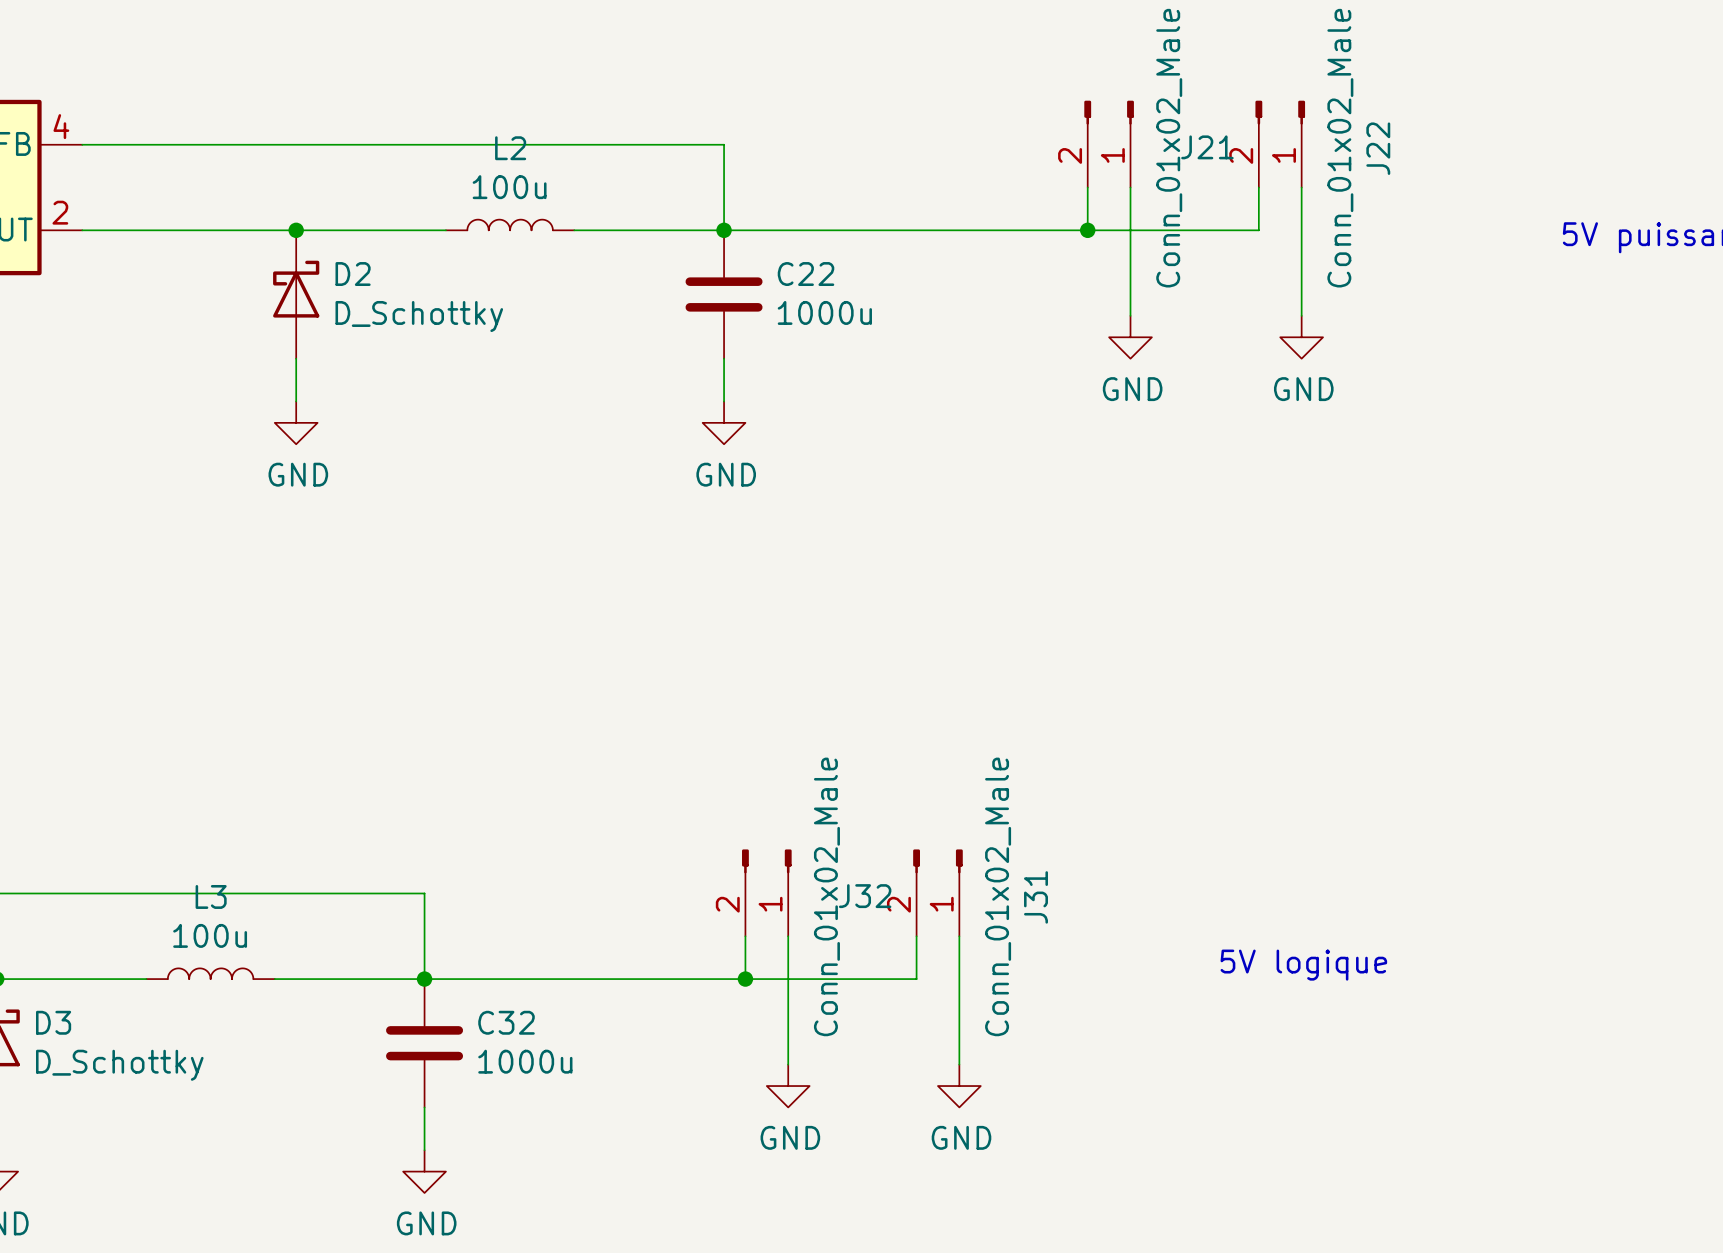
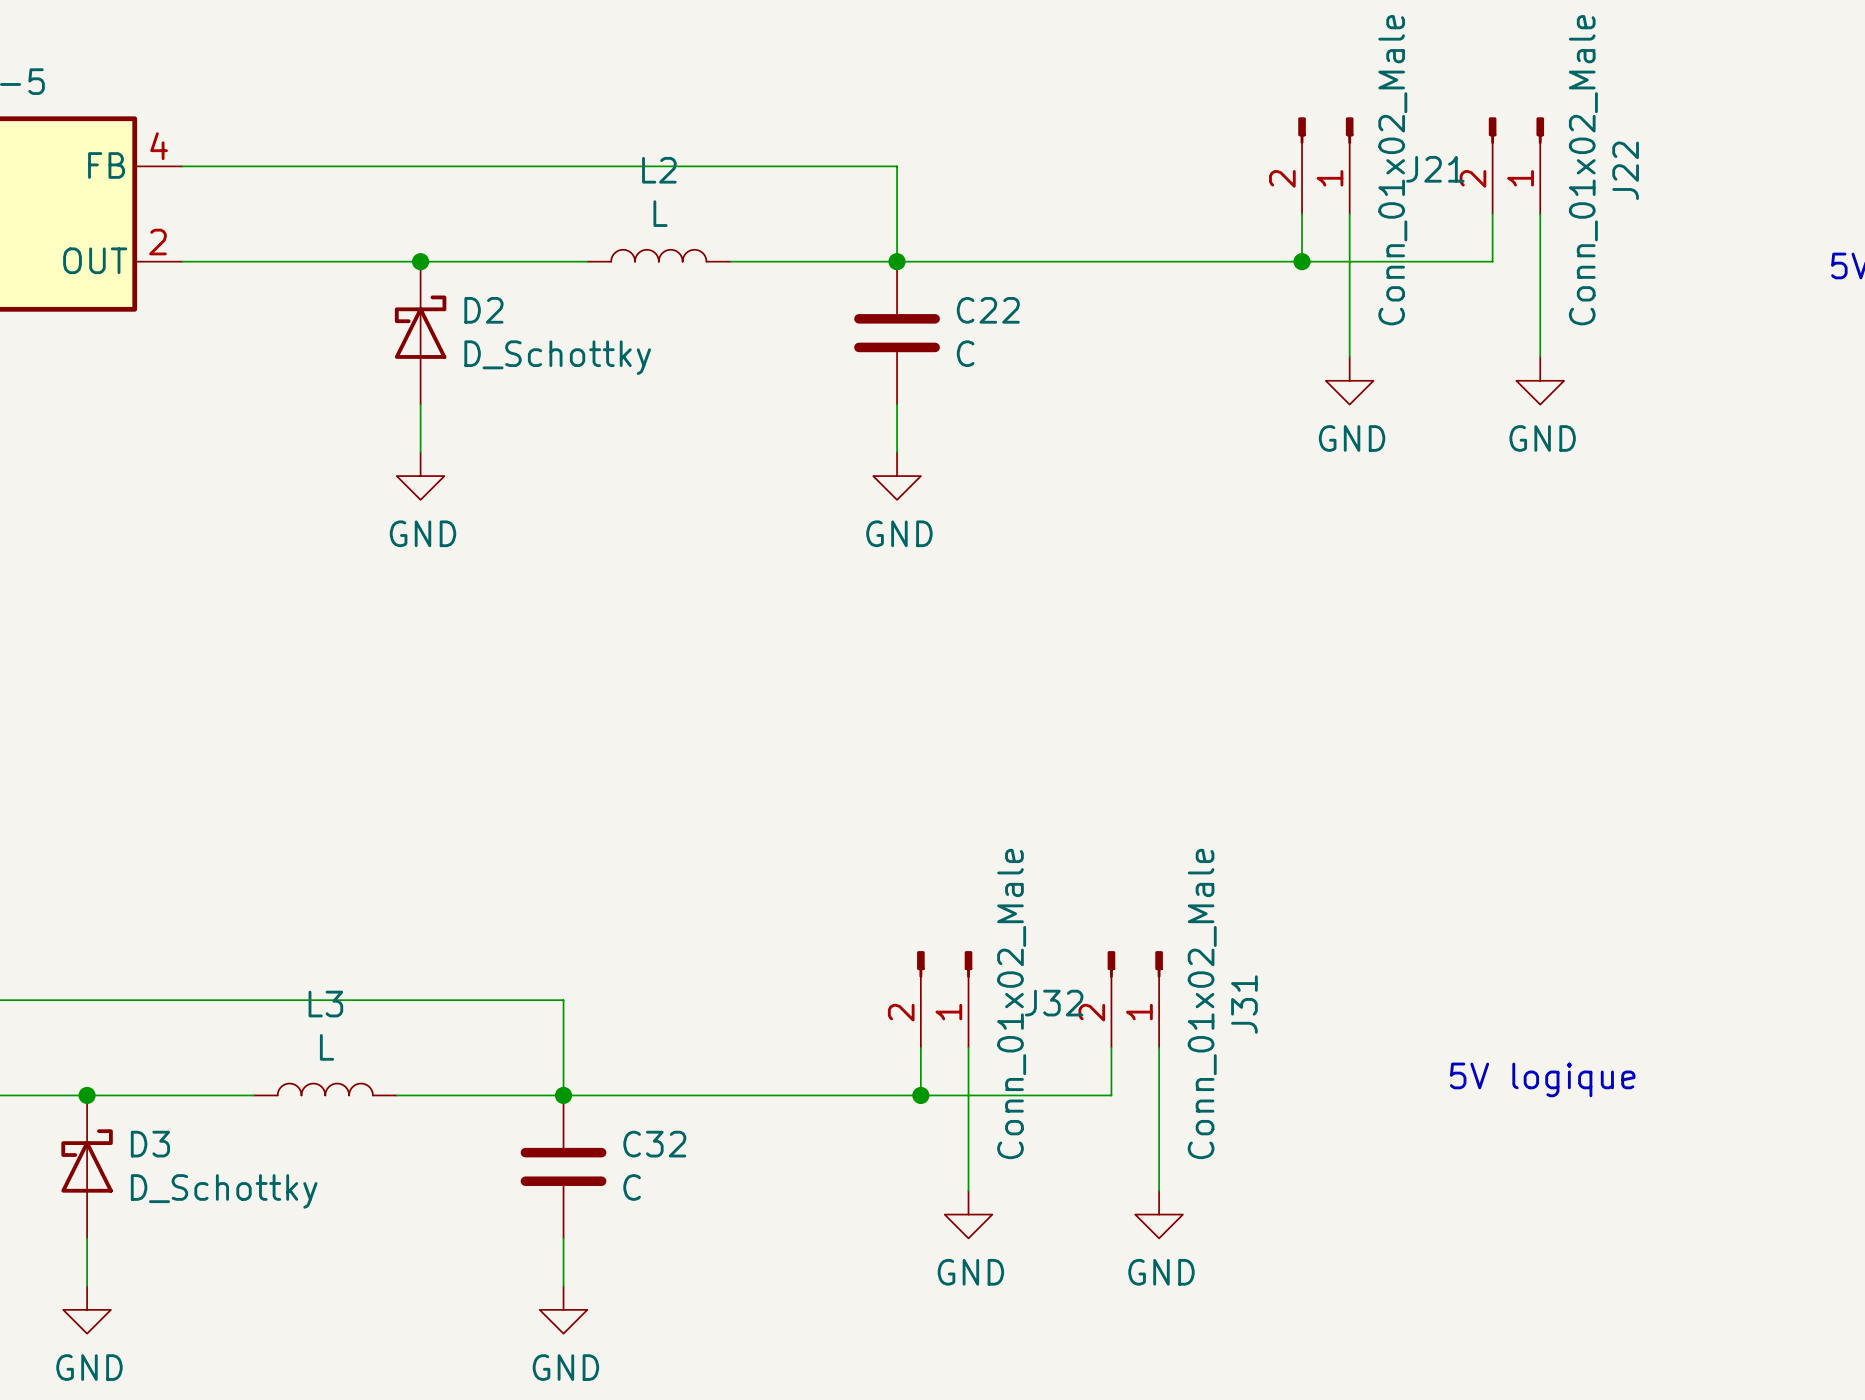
L2 value: 100u (509, 187) -> L (660, 213)
C22 value: 1000u (824, 312) -> C (965, 353)
L3 value: 100u (210, 935) -> L (327, 1047)
C32 value: 1000u (525, 1061) -> C (632, 1187)

